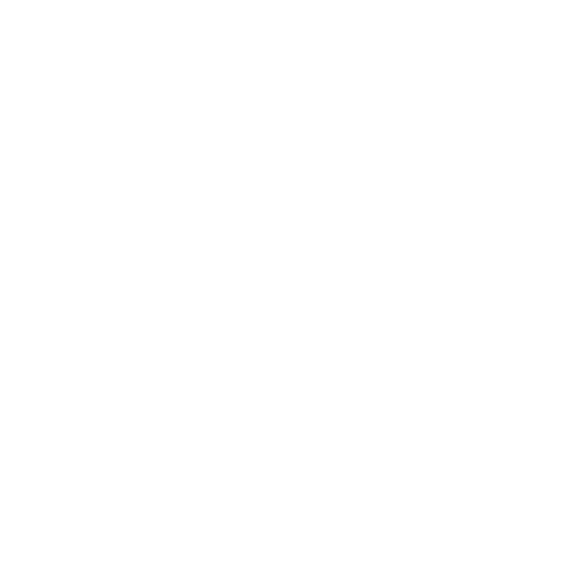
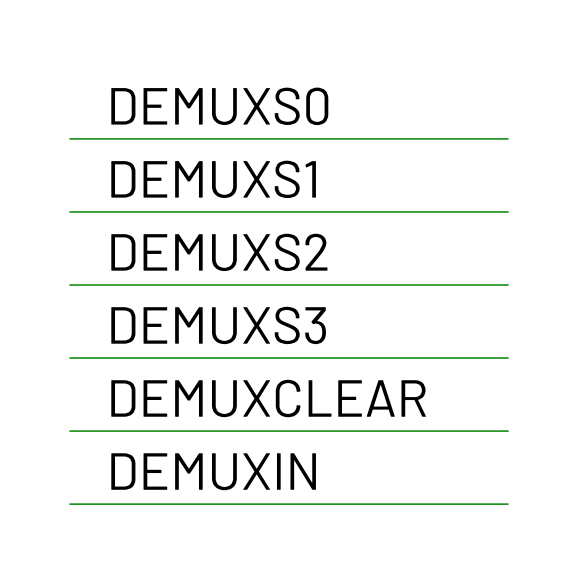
label: none -> DEMUXS0 (219, 106)
wire: none -> (69, 138) (508, 138)
label: none -> DEMUXS1 (213, 179)
wire: none -> (69, 211) (508, 211)
label: none -> DEMUXS2 (219, 252)
wire: none -> (69, 284) (508, 284)
label: none -> DEMUXS3 (218, 325)
wire: none -> (69, 358) (508, 358)
label: none -> DEMUXCLEAR (268, 398)
wire: none -> (69, 431) (508, 431)
label: none -> DEMUXIN (213, 471)
wire: none -> (69, 504) (508, 504)

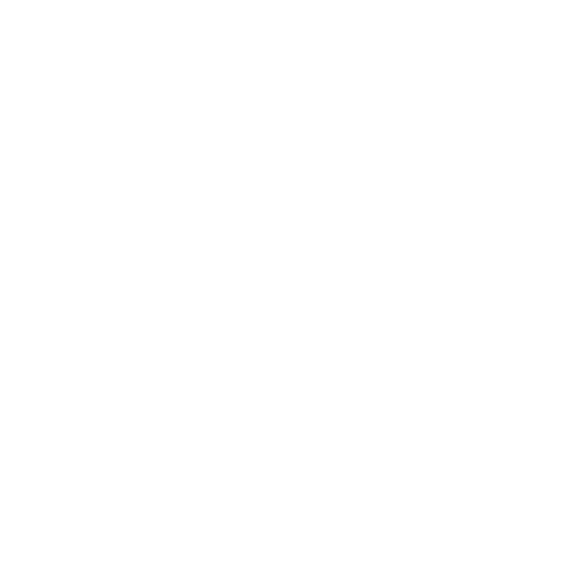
label: DEMUXS0 (219, 106) -> none
wire: (69, 138) (508, 138) -> none
label: DEMUXS1 (213, 179) -> none
wire: (69, 211) (508, 211) -> none
label: DEMUXS2 (219, 252) -> none
wire: (69, 284) (508, 284) -> none
label: DEMUXS3 (218, 325) -> none
wire: (69, 358) (508, 358) -> none
label: DEMUXCLEAR (268, 398) -> none
wire: (69, 431) (508, 431) -> none
label: DEMUXIN (213, 471) -> none
wire: (69, 504) (508, 504) -> none

